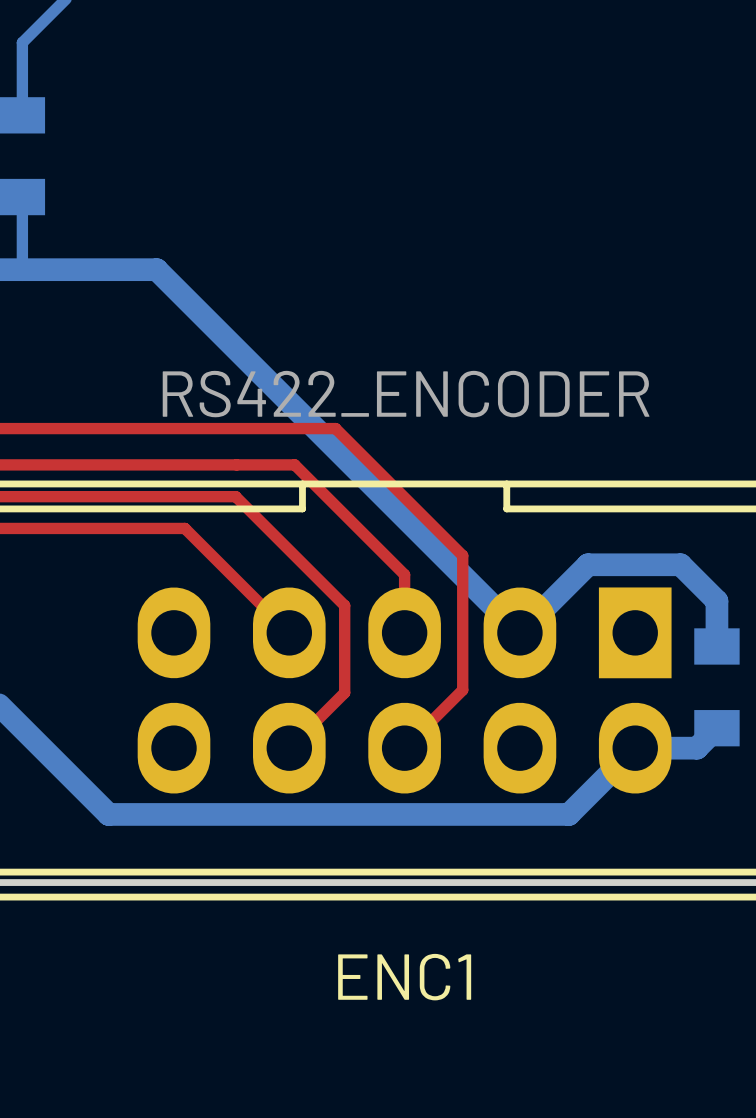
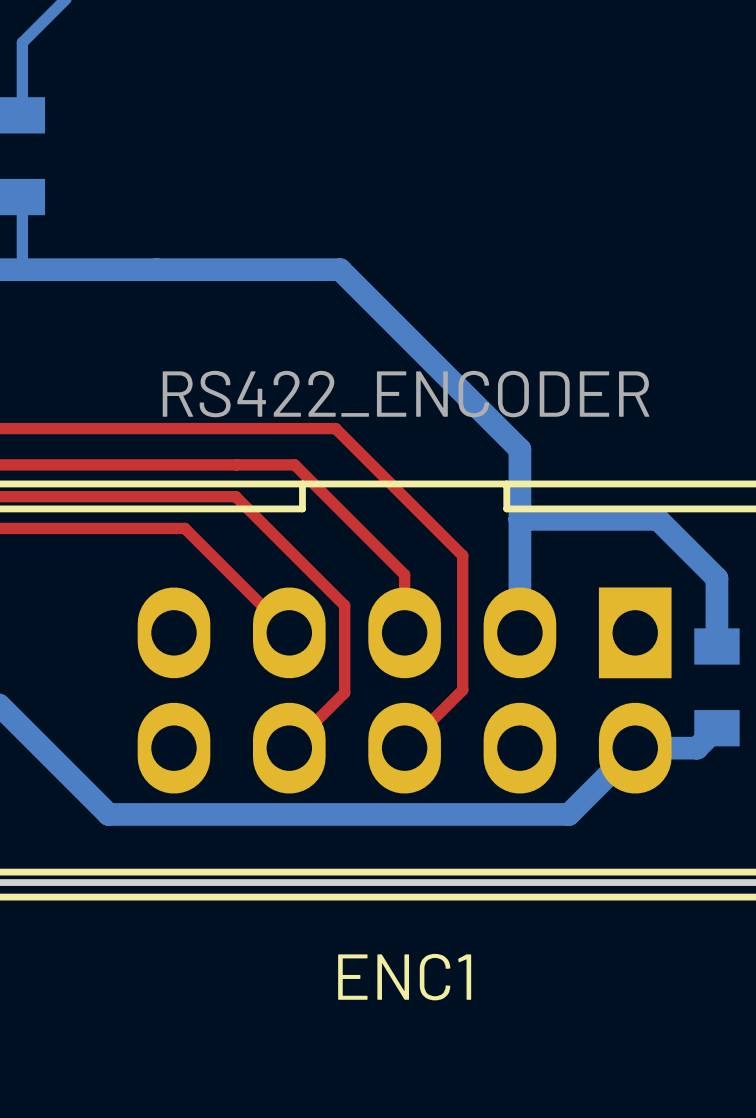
bottom track: (156, 269) (519, 632) (588, 564) (680, 564) (716, 601) -> (156, 269) (340, 269) (519, 449) (519, 632)
bottom track: none -> (519, 519) (657, 519) (716, 578) (716, 601)

